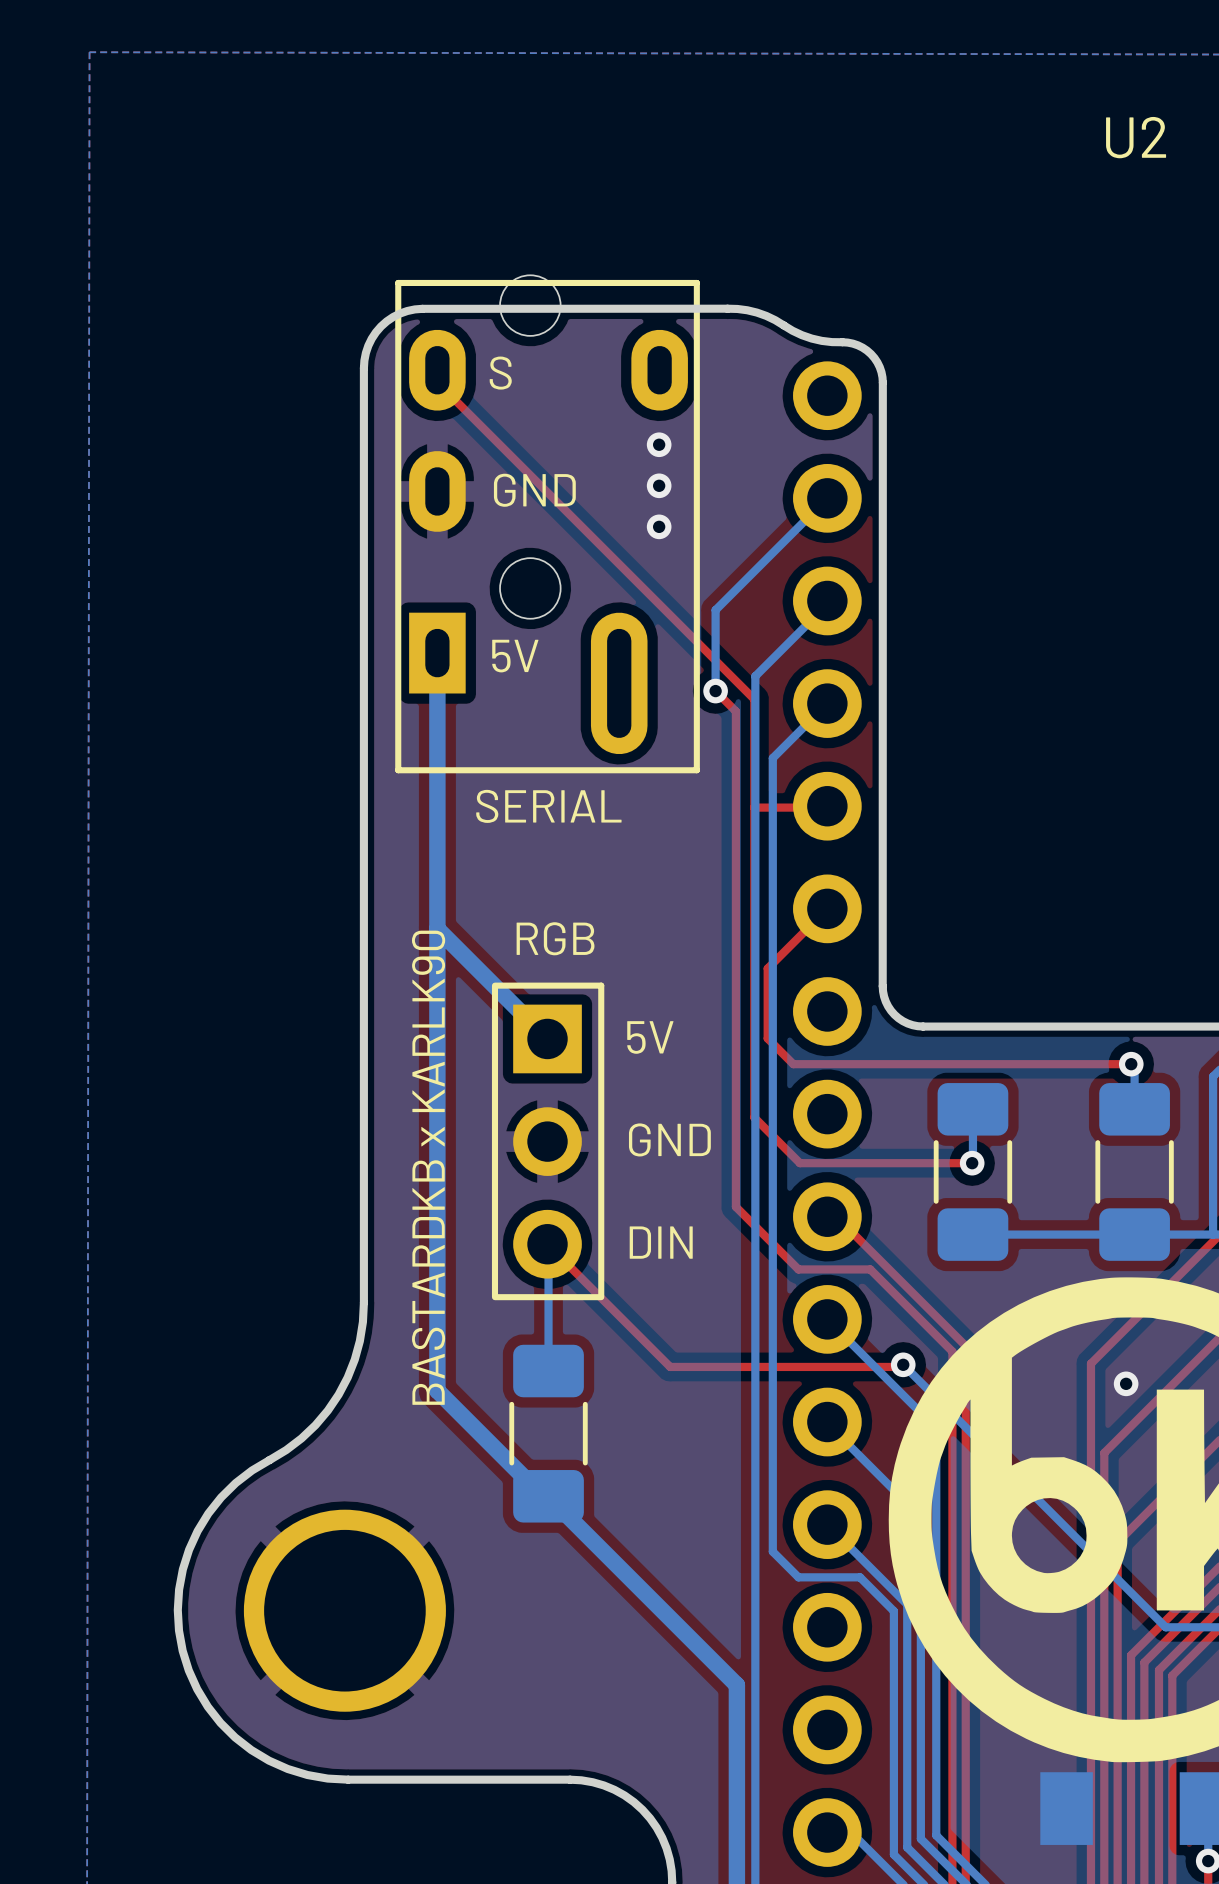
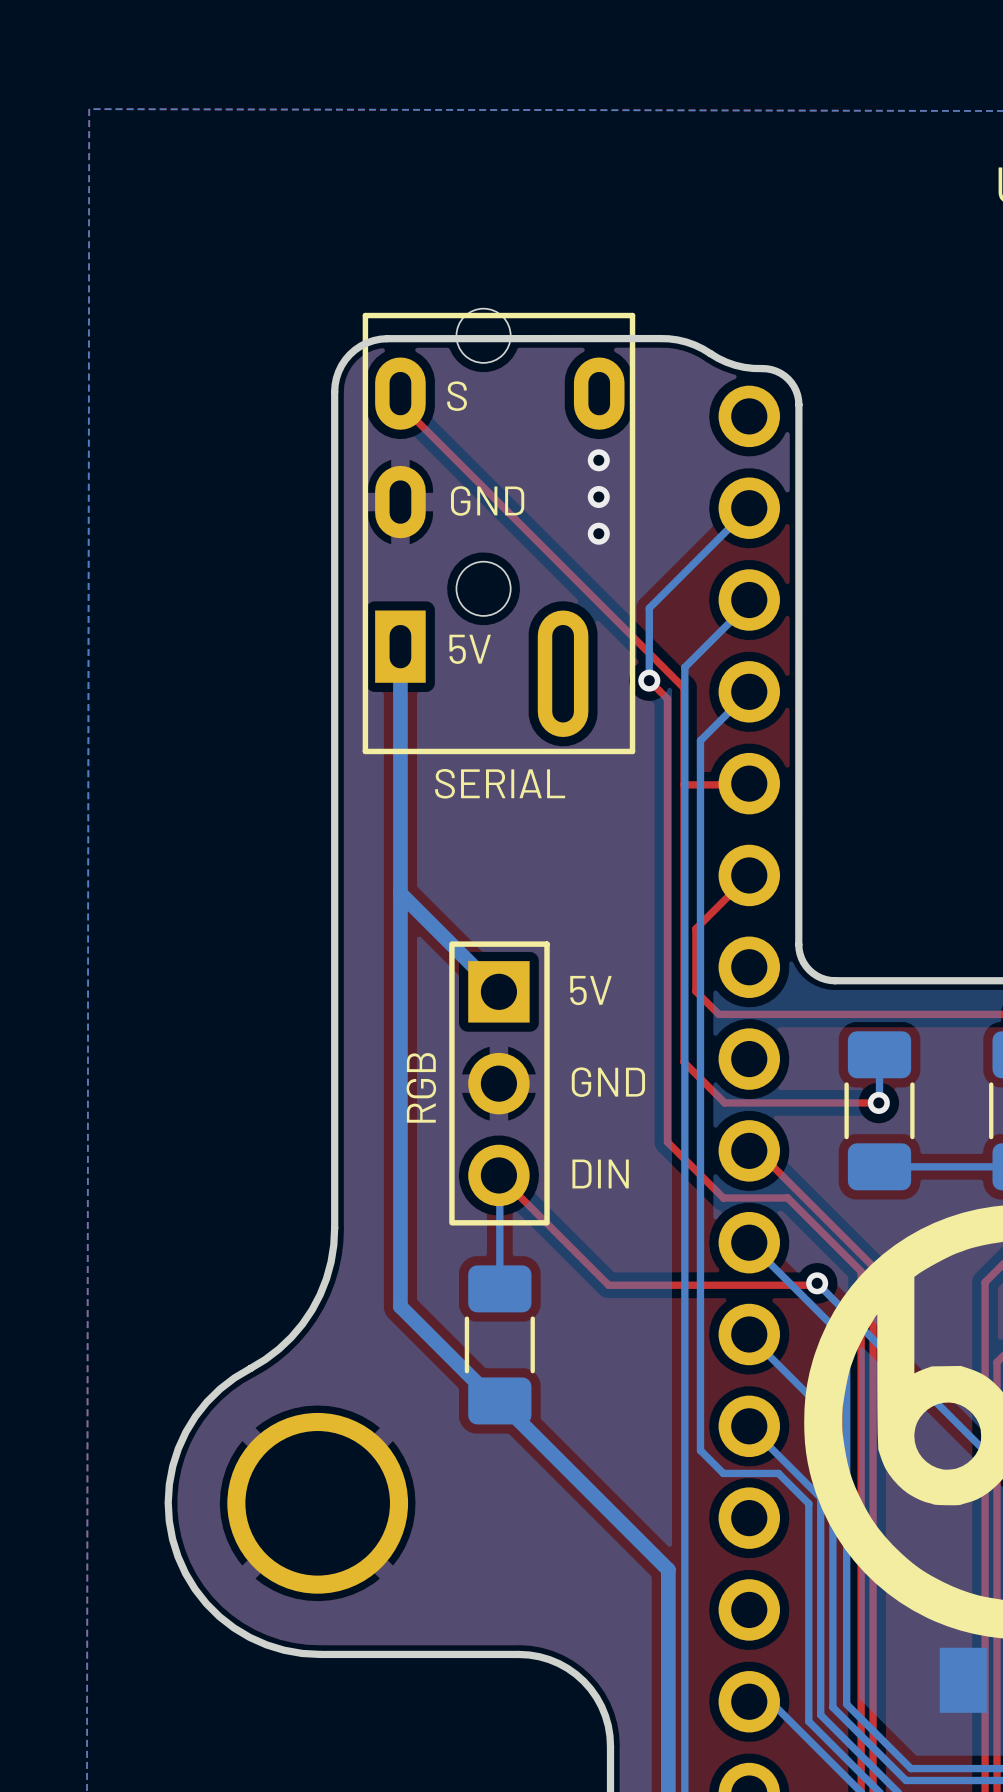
text: RGB (555, 938) -> none
text: BASTARDKB x KARLK90 (428, 1167) -> RGB (421, 1087)

